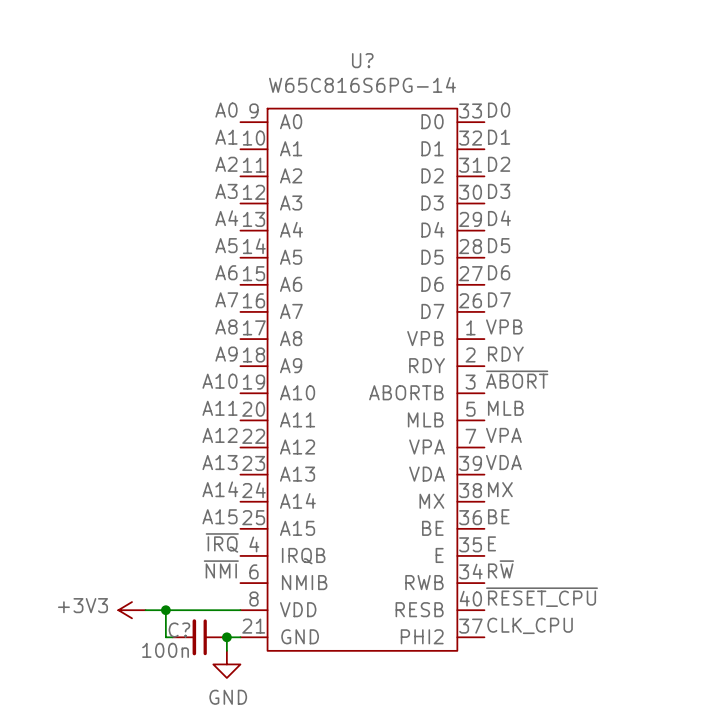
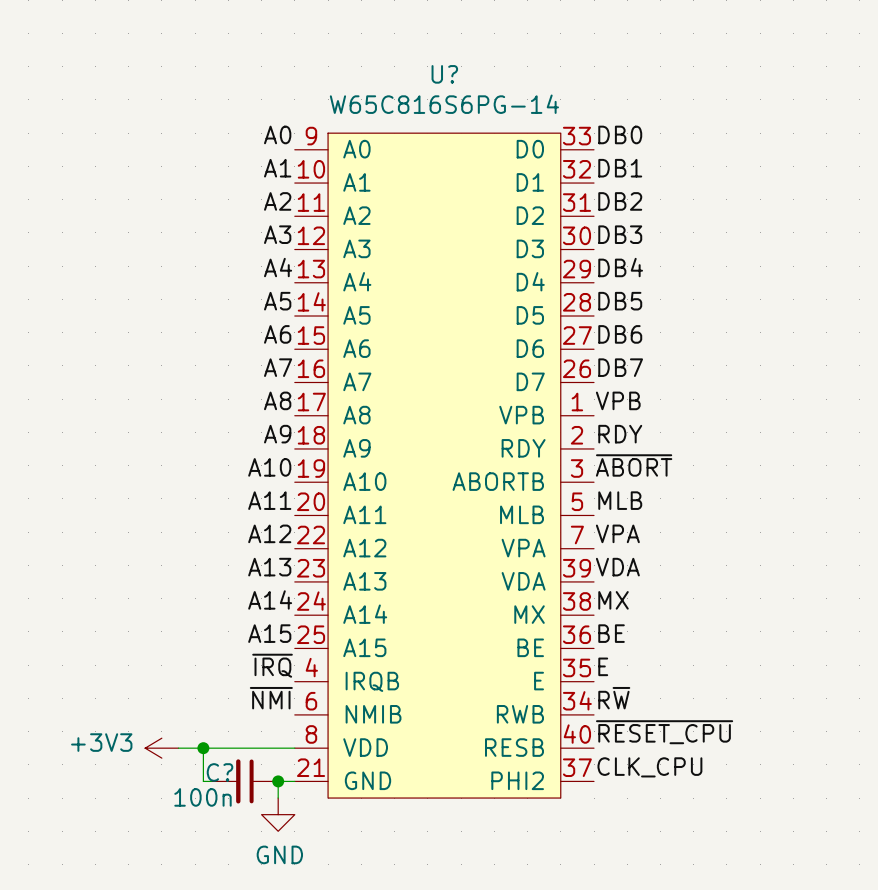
label: D0 (499, 110) -> DB0 (620, 134)
label: D1 (499, 137) -> DB1 (620, 168)
label: D2 (499, 164) -> DB2 (620, 201)
label: D3 (499, 191) -> DB3 (620, 234)
label: D4 (499, 218) -> DB4 (620, 267)
label: D5 (499, 245) -> DB5 (620, 301)
label: D6 (499, 272) -> DB6 (620, 334)
label: D7 (499, 299) -> DB7 (620, 367)

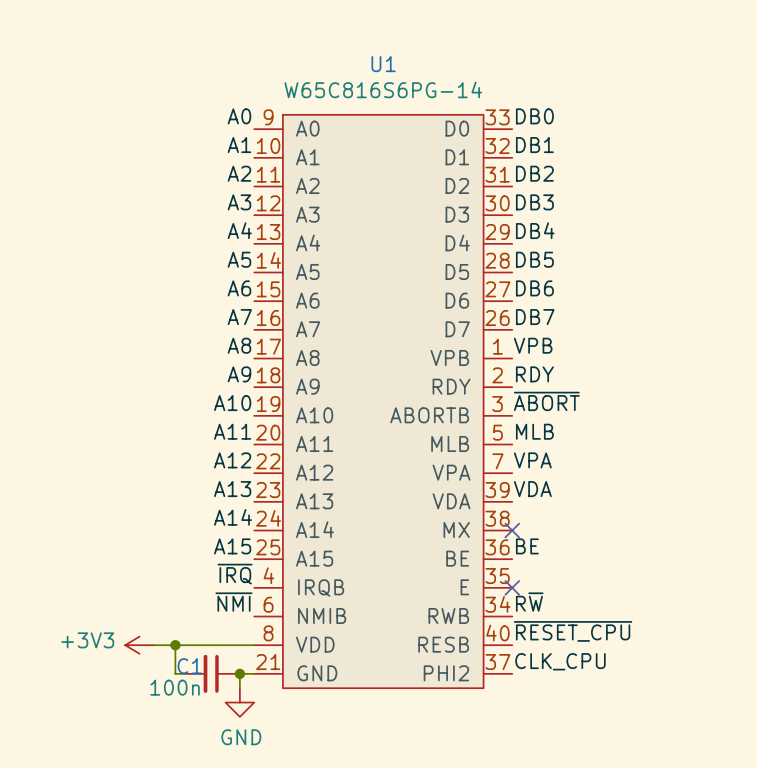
U? name: U? (444, 74) -> U1 (383, 64)
label: MX (613, 600) -> none
no-connect mark: none -> (512, 530)
label: E (603, 666) -> none
no-connect mark: none -> (512, 587)
C? name: C? (220, 772) -> C1 (189, 666)

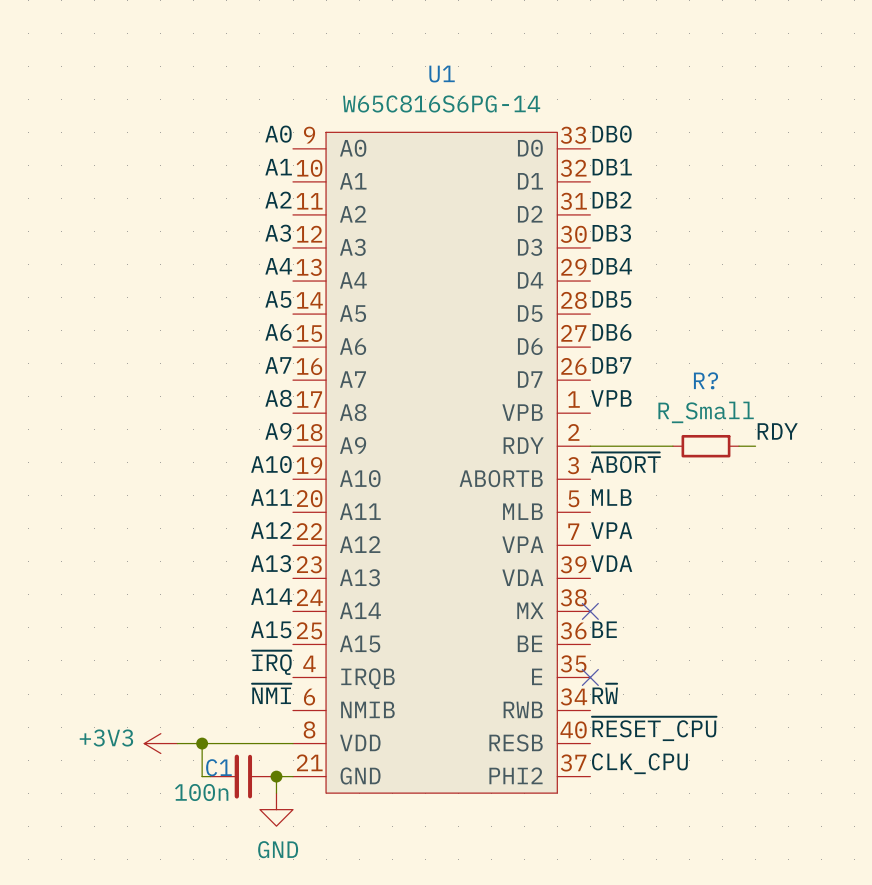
label position: RDY (534, 374) -> RDY (777, 431)
wire: none -> (590, 446) (672, 446)
R?: none -> R_Small (705, 446)
wire: none -> (739, 446) (755, 446)

